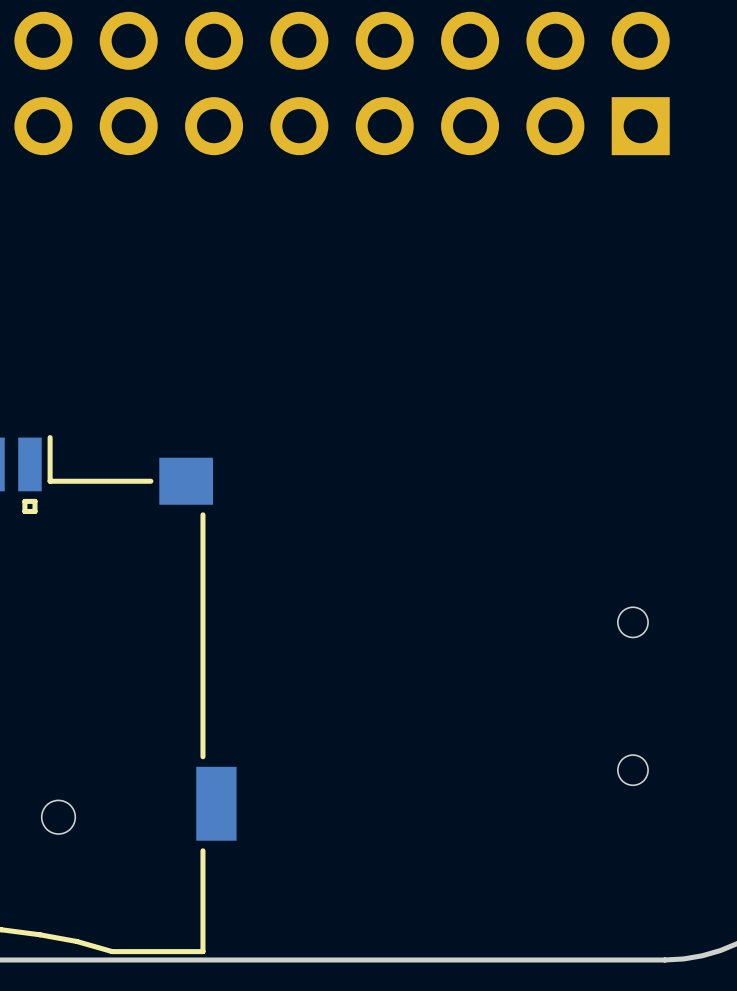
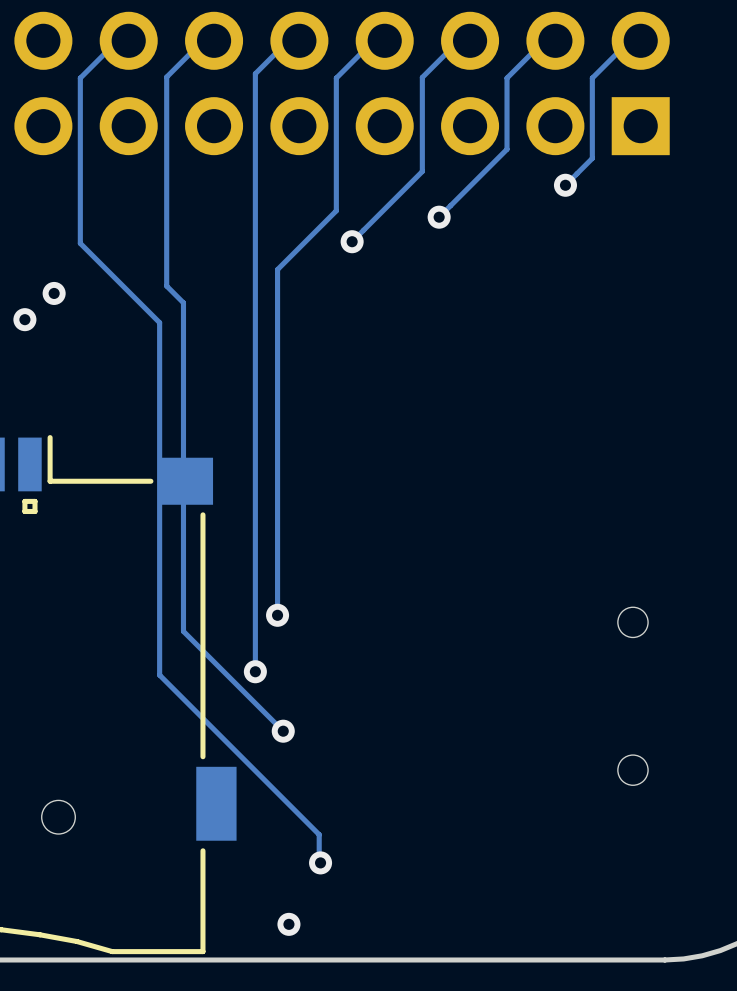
track: none -> (123, 34) (80, 78) (80, 243) (159, 322) (159, 675) (319, 834) (320, 862)
track: none -> (209, 34) (166, 77) (166, 286) (183, 302) (183, 631) (283, 731)
track: none -> (294, 34) (255, 73) (255, 671)
track: none -> (379, 34) (336, 78) (336, 210) (277, 269) (277, 615)
track: none -> (465, 34) (422, 77) (422, 171) (352, 241)
track: none -> (550, 34) (507, 78) (507, 149) (439, 217)
track: none -> (635, 34) (592, 78) (592, 158) (565, 185)
via: none -> (565, 185)
via: none -> (439, 217)
via: none -> (352, 241)
via: none -> (54, 293)
via: none -> (24, 319)
via: none -> (277, 615)
via: none -> (255, 671)
via: none -> (283, 731)
via: none -> (320, 862)
via: none -> (288, 924)

